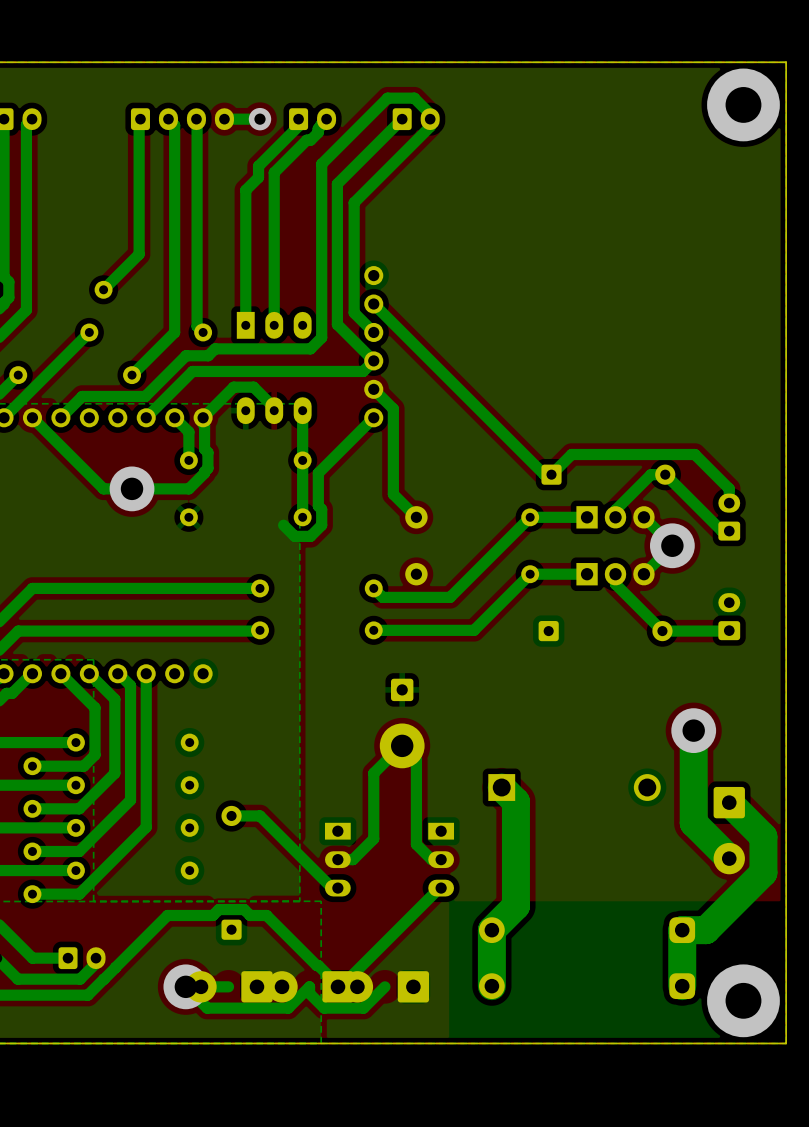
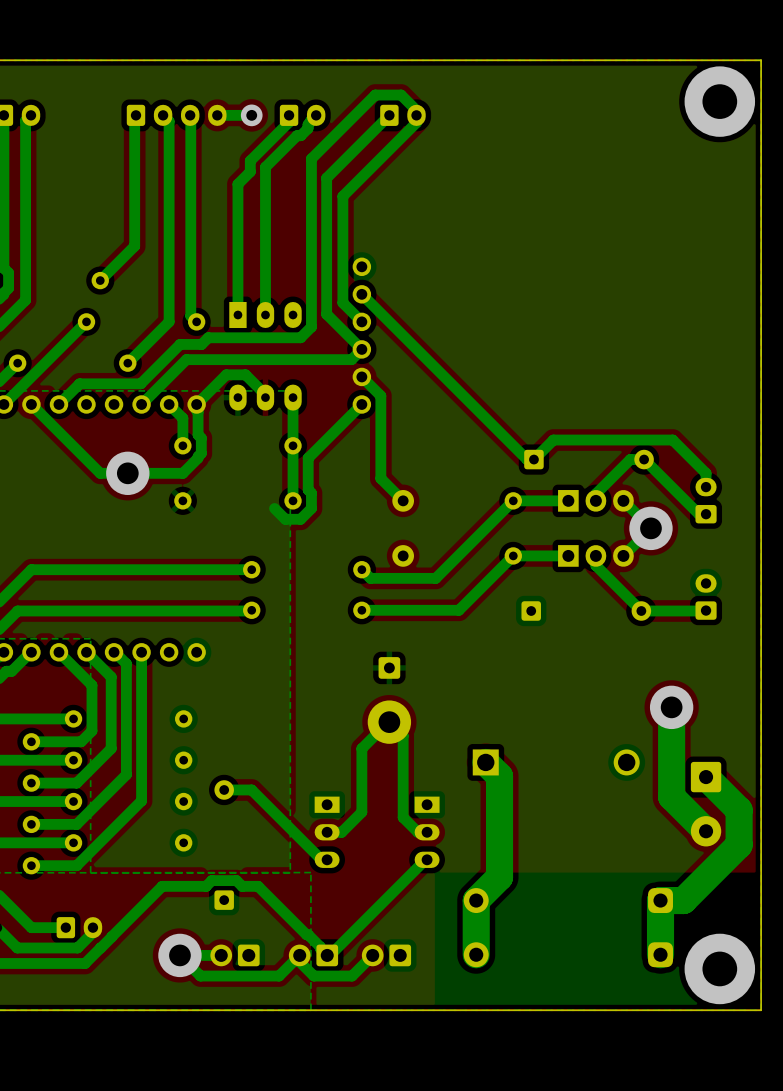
part: (228, 986) -> none
part: none -> (235, 955)
part: (310, 986) -> none
part: none -> (313, 955)
part: (385, 986) -> none
part: none -> (386, 955)

